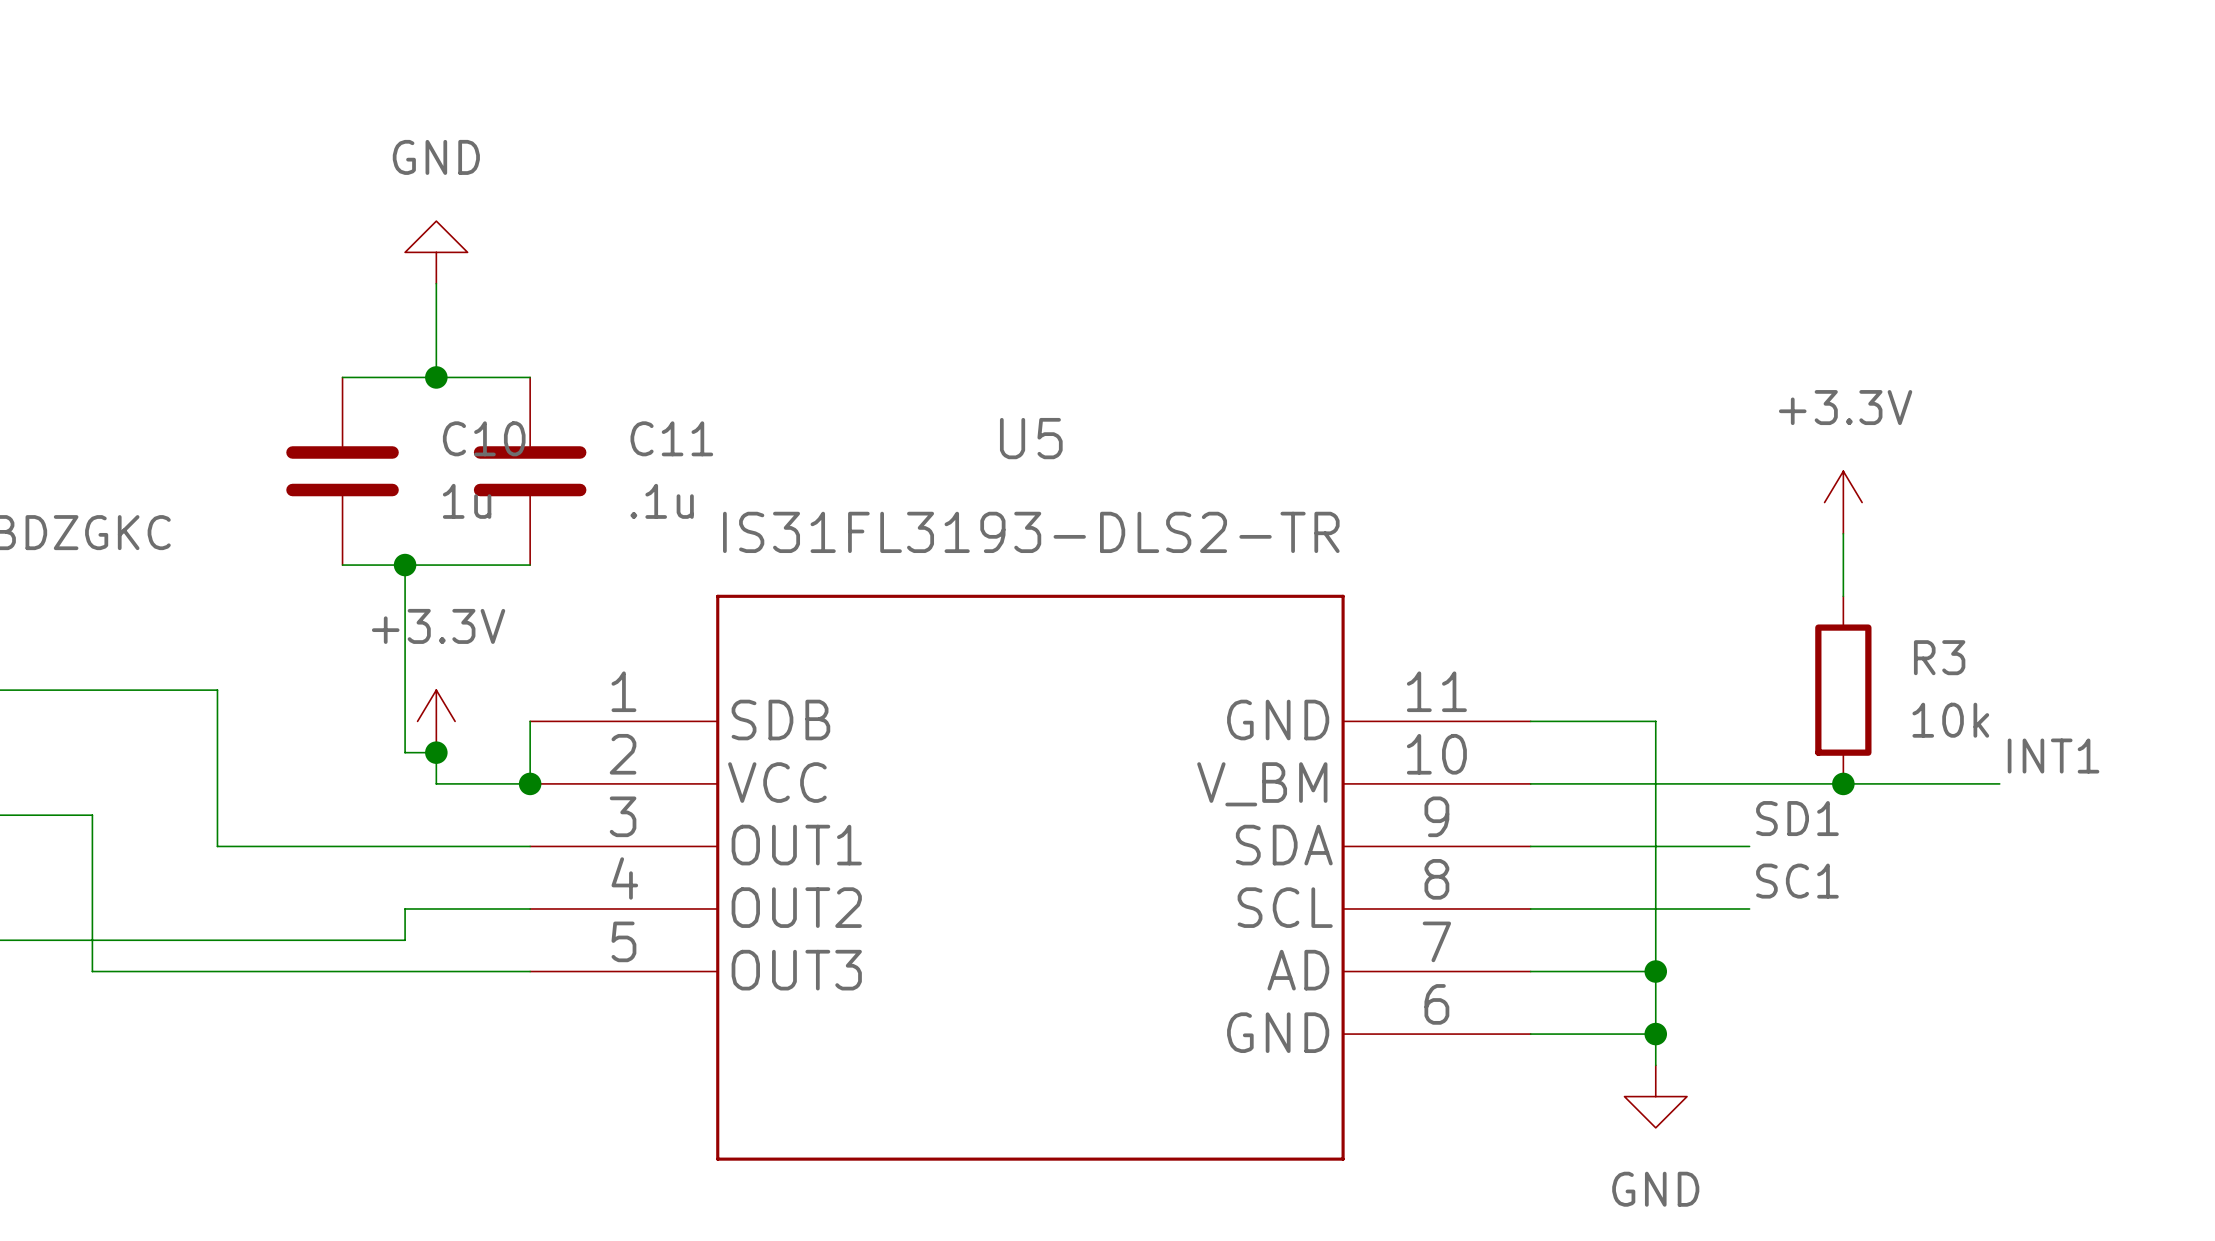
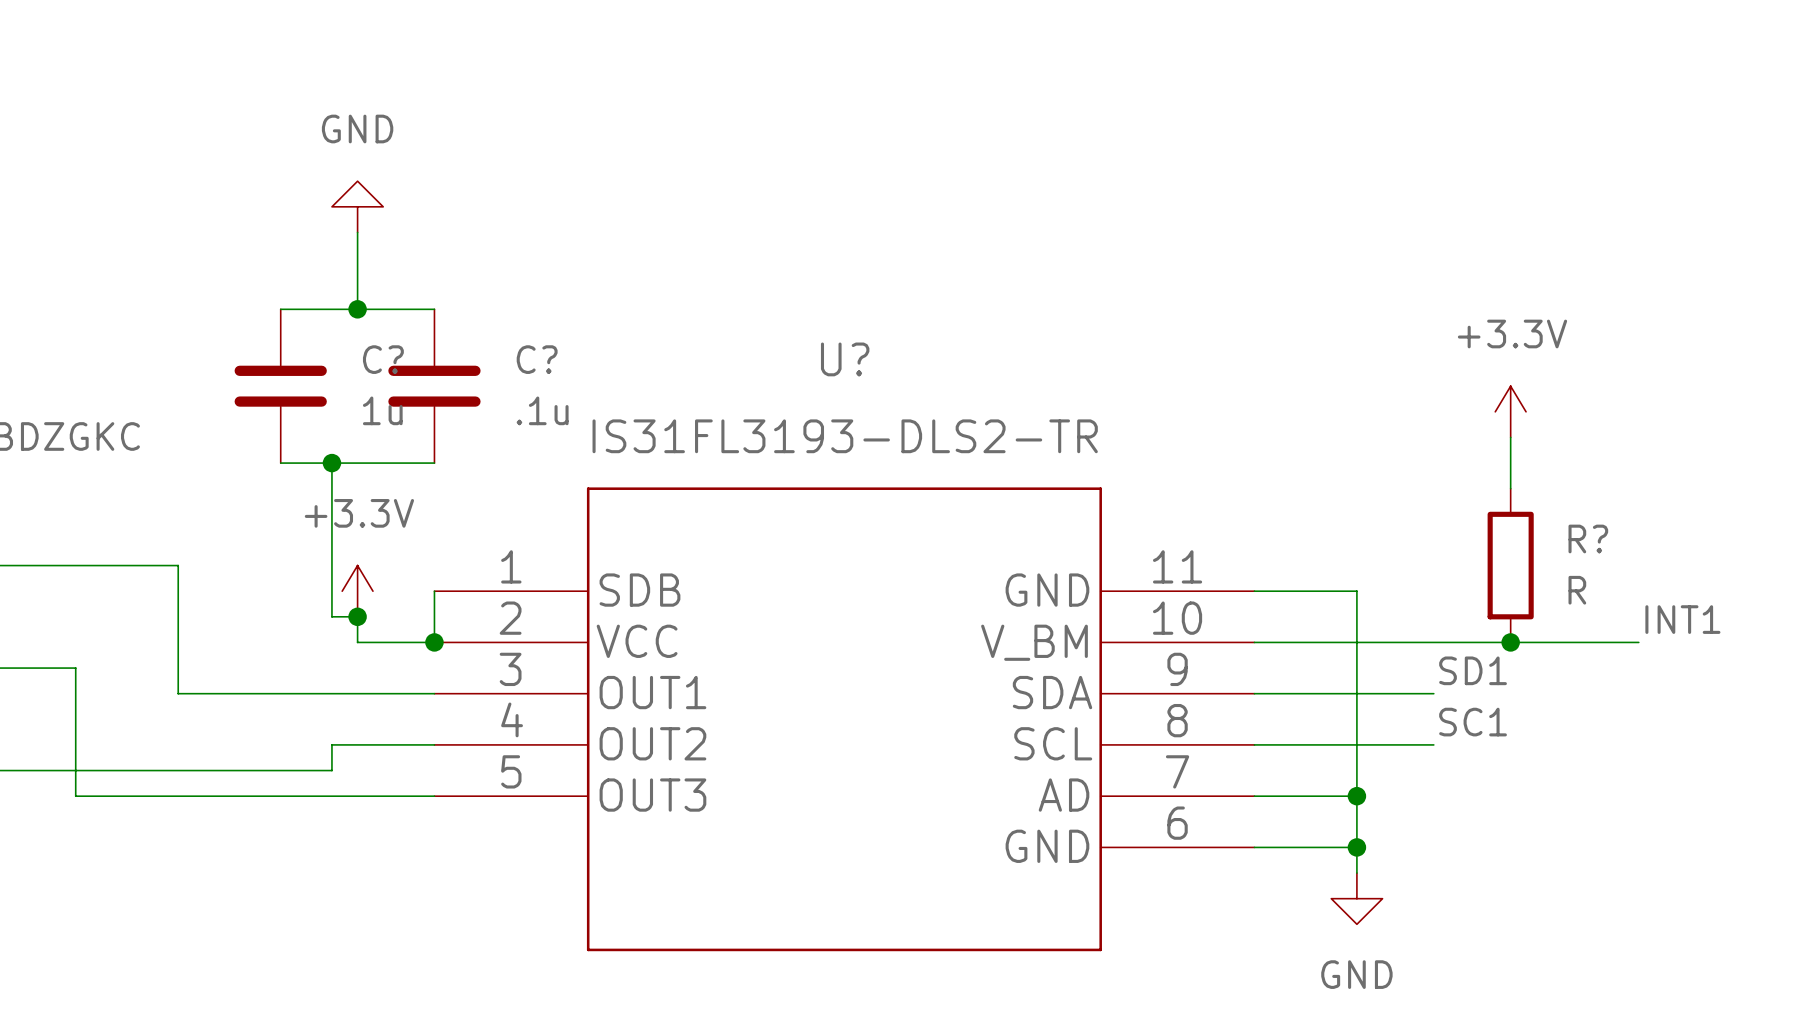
C10 name: C10 (484, 438) -> C? (383, 359)
C11 name: C11 (671, 438) -> C? (537, 359)
U5 name: U5 (1031, 438) -> U? (845, 359)
R3 name: R3 (1939, 657) -> R? (1588, 538)
R3 value: 10k (1950, 720) -> R (1577, 590)

